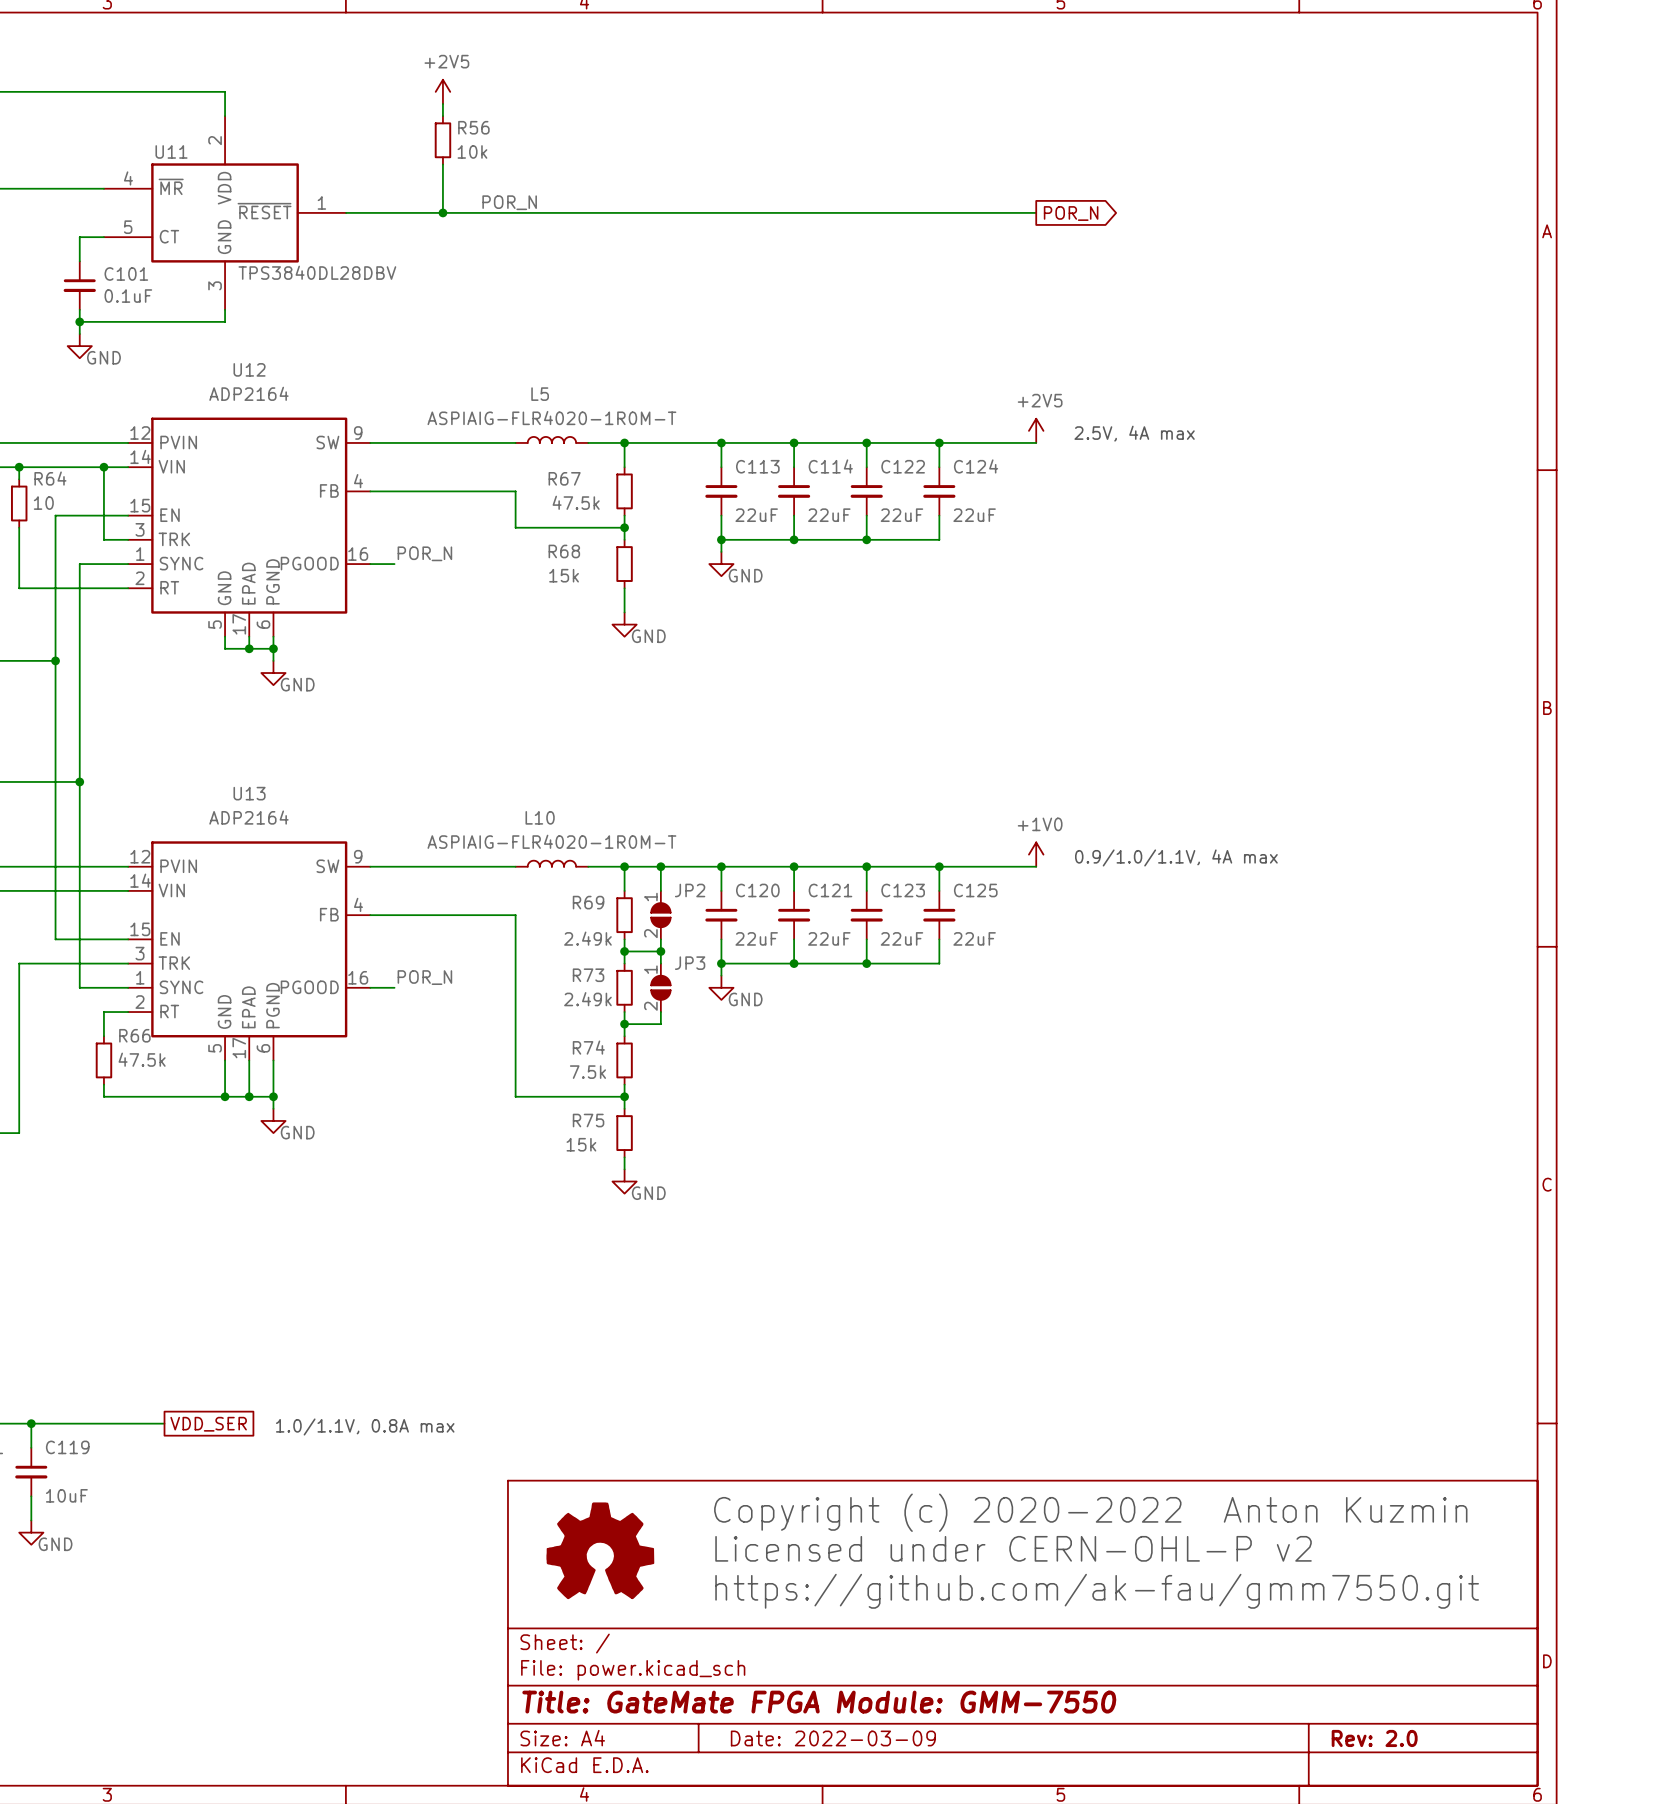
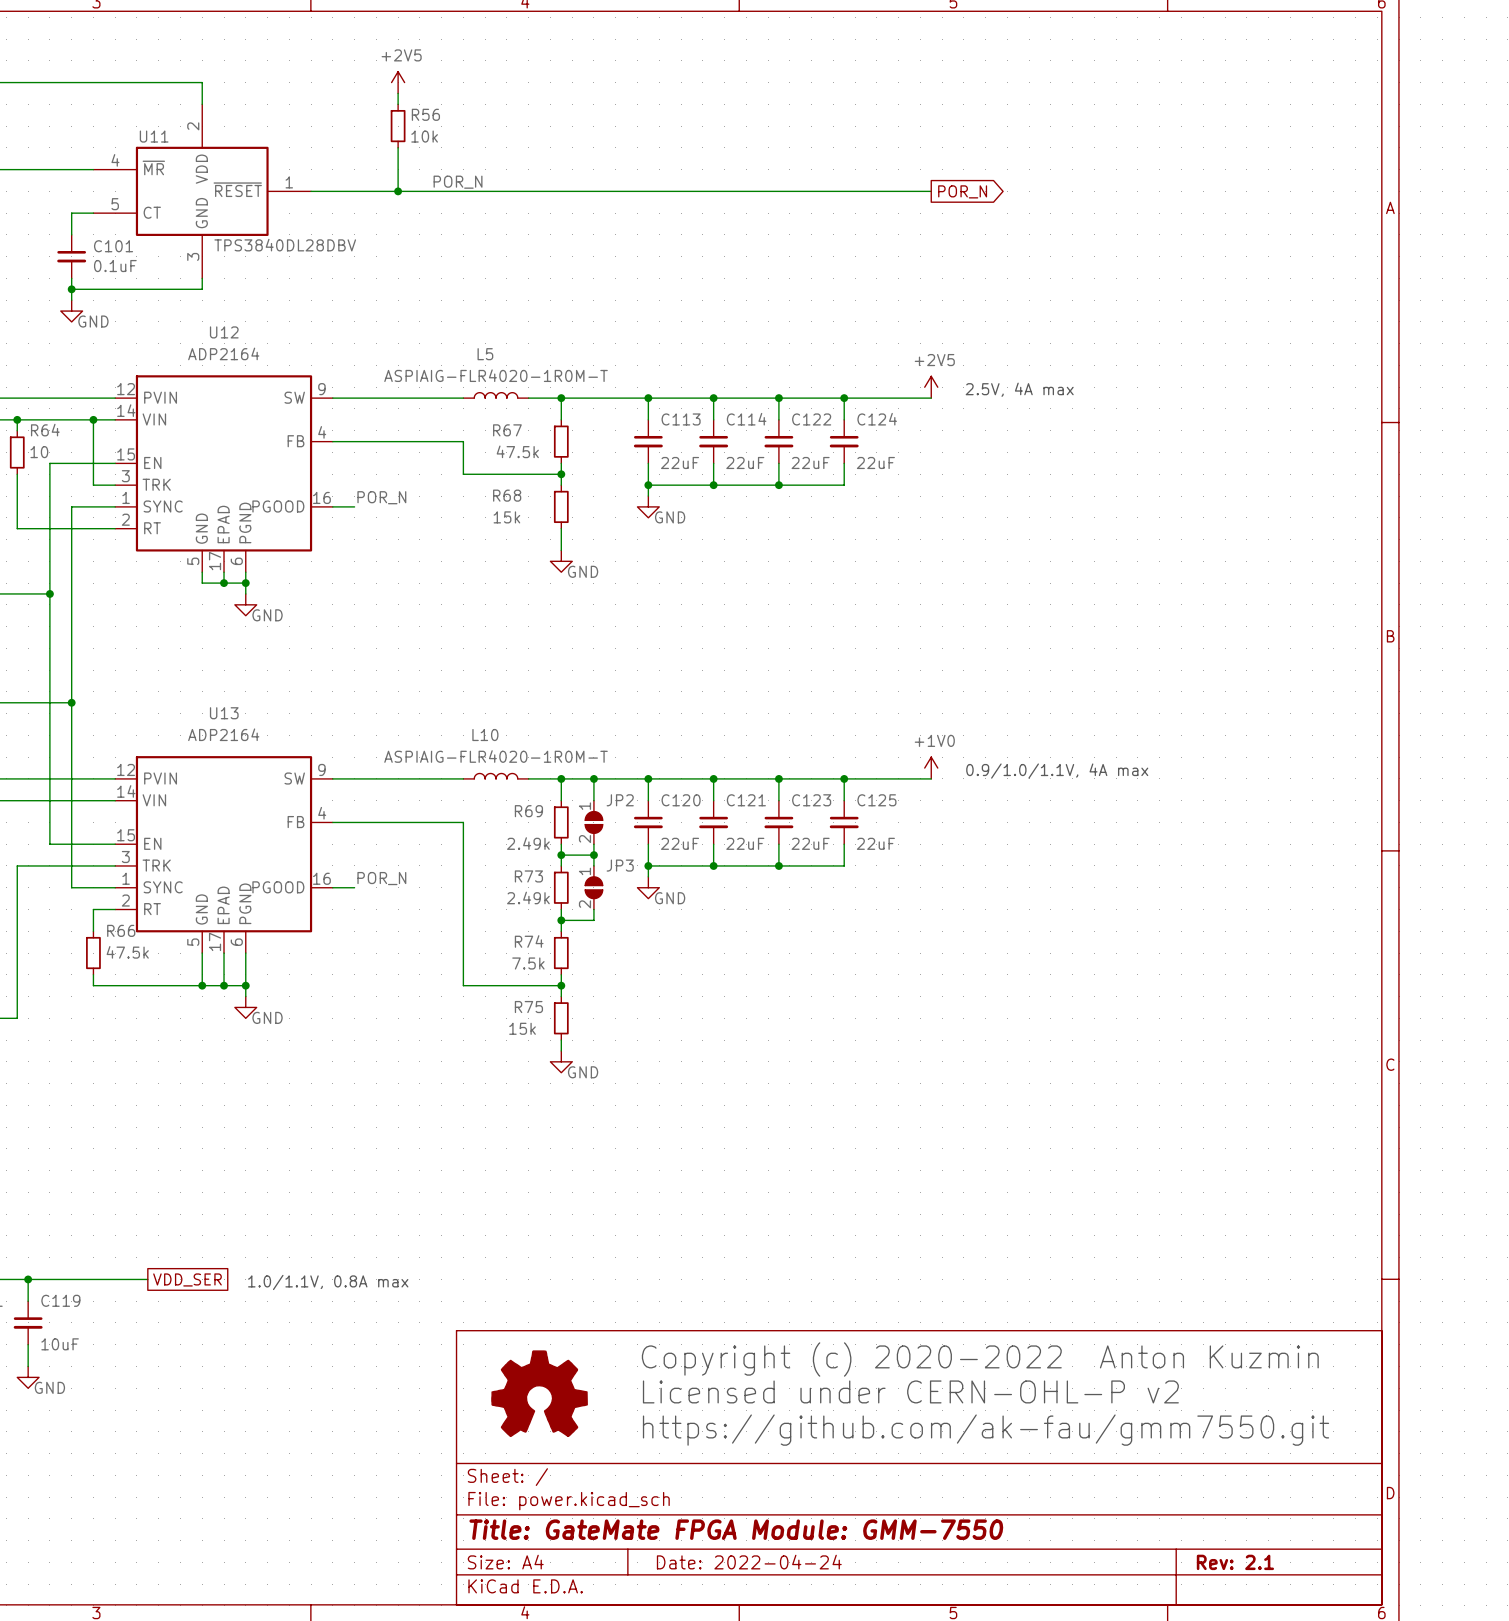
title block: Date: 2022-03-09 (833, 1738) -> Date: 2022-04-24 (749, 1562)
title block: Rev: 2.0 (1374, 1738) -> Rev: 2.1 (1235, 1562)

